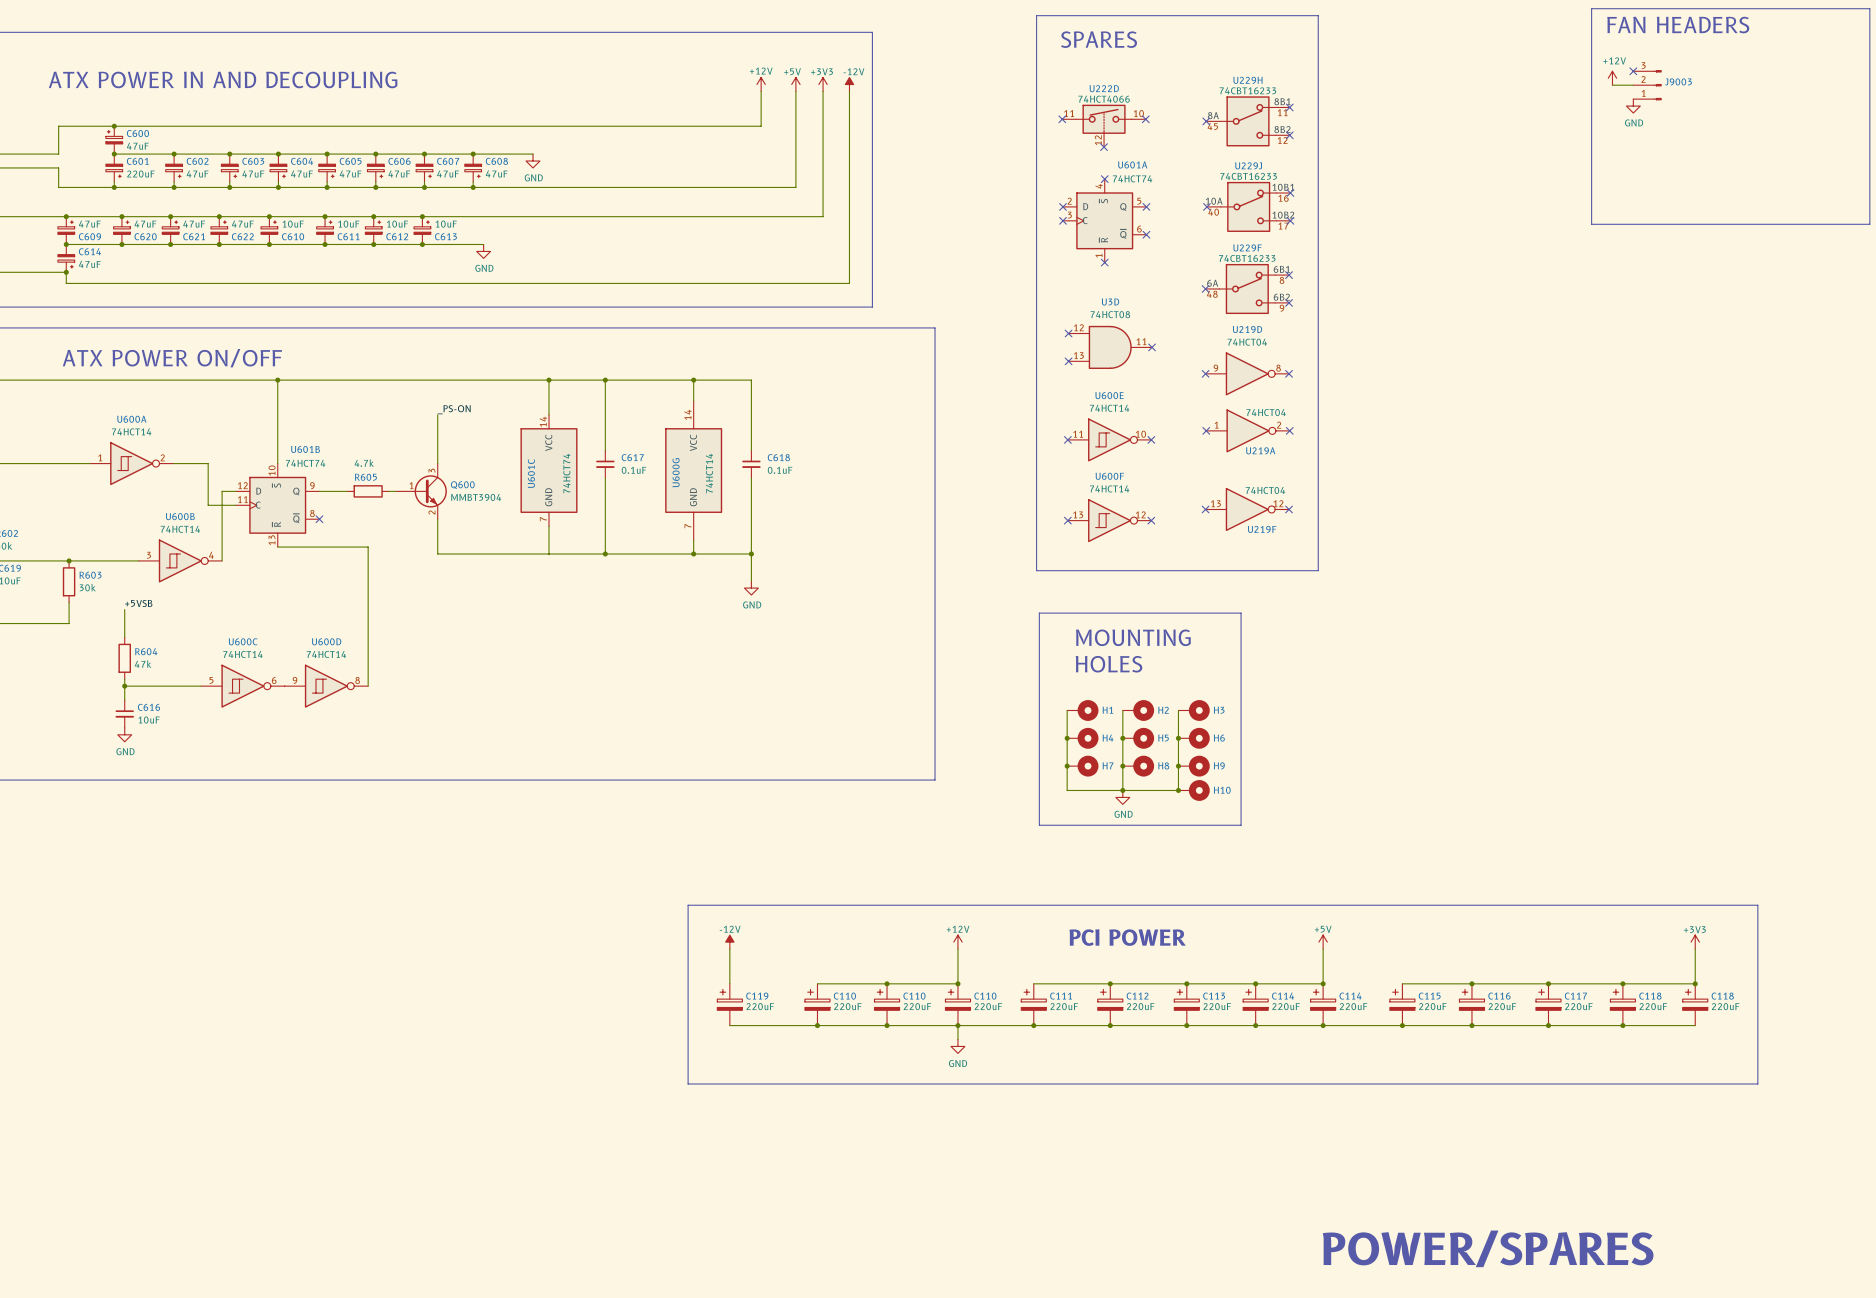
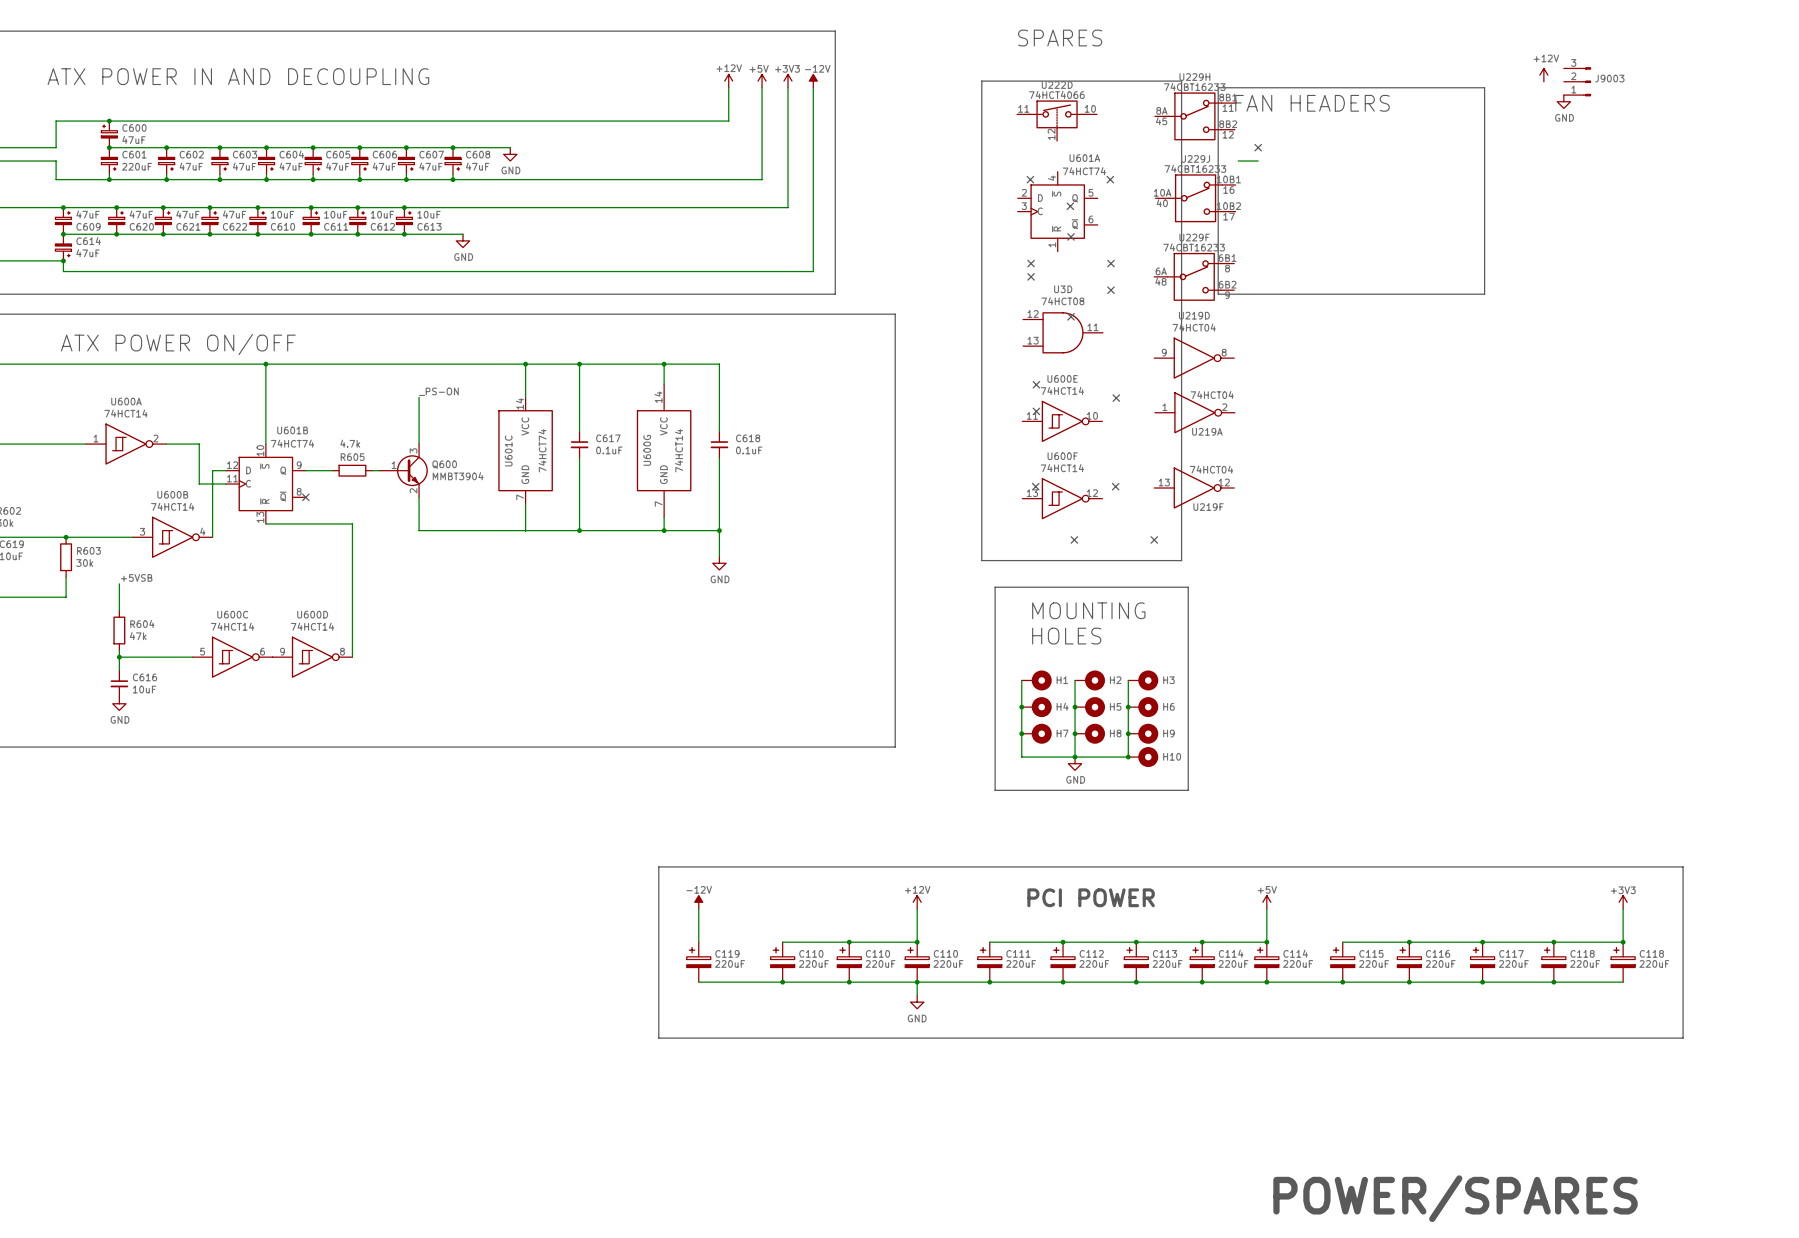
line: (1591, 8) (1591, 224) (1869, 224) (1869, 8) (1591, 8) -> none
line: (1036, 15) (1318, 15) (1318, 570) (1036, 570) (1036, 15) -> (981, 81) (981, 560) (1181, 560) (1181, 81) (981, 81)
text: FAN HEADERS (1678, 25) -> none
no-connect mark: (1633, 71) -> none
wire: (1612, 85) (1633, 85) -> none
line: none -> (1218, 87) (1218, 294) (1484, 294) (1484, 87) (1218, 87)
no-connect mark: (1289, 107) -> none
text: none -> FAN HEADERS (1312, 103)
no-connect mark: (1062, 119) -> none
no-connect mark: (1145, 119) -> none
no-connect mark: (1206, 121) -> none
no-connect mark: (1289, 135) -> none
no-connect mark: (1104, 147) -> none
no-connect mark: none -> (1258, 147)
wire: none -> (1238, 161) (1258, 161)
no-connect mark: (1104, 179) -> none
no-connect mark: none -> (1030, 179)
no-connect mark: none -> (1110, 179)
no-connect mark: (1290, 193) -> none
no-connect mark: (1063, 206) -> none
no-connect mark: (1146, 206) -> none
no-connect mark: (1206, 206) -> none
no-connect mark: none -> (1070, 206)
no-connect mark: (1063, 220) -> none
no-connect mark: (1290, 220) -> none
no-connect mark: (1146, 234) -> none
no-connect mark: none -> (1071, 236)
no-connect mark: (1104, 262) -> none
no-connect mark: none -> (1031, 263)
no-connect mark: none -> (1110, 263)
no-connect mark: (1289, 275) -> none
no-connect mark: none -> (1031, 276)
no-connect mark: (1205, 288) -> none
no-connect mark: none -> (1110, 290)
no-connect mark: (1289, 302) -> none
no-connect mark: none -> (1071, 316)
no-connect mark: (1068, 333) -> none
no-connect mark: (1152, 347) -> none
no-connect mark: (1068, 361) -> none
no-connect mark: (1205, 373) -> none
no-connect mark: (1289, 373) -> none
no-connect mark: none -> (1036, 384)
no-connect mark: none -> (1116, 398)
no-connect mark: (1206, 430) -> none
no-connect mark: (1289, 430) -> none
no-connect mark position: (1067, 439) -> (1036, 411)
no-connect mark: (1151, 439) -> none
no-connect mark: (1205, 509) -> none
no-connect mark: (1289, 509) -> none
no-connect mark position: (1067, 520) -> (1035, 486)
no-connect mark position: (1151, 520) -> (1115, 486)
no-connect mark: none -> (1074, 539)
no-connect mark: none -> (1154, 539)

